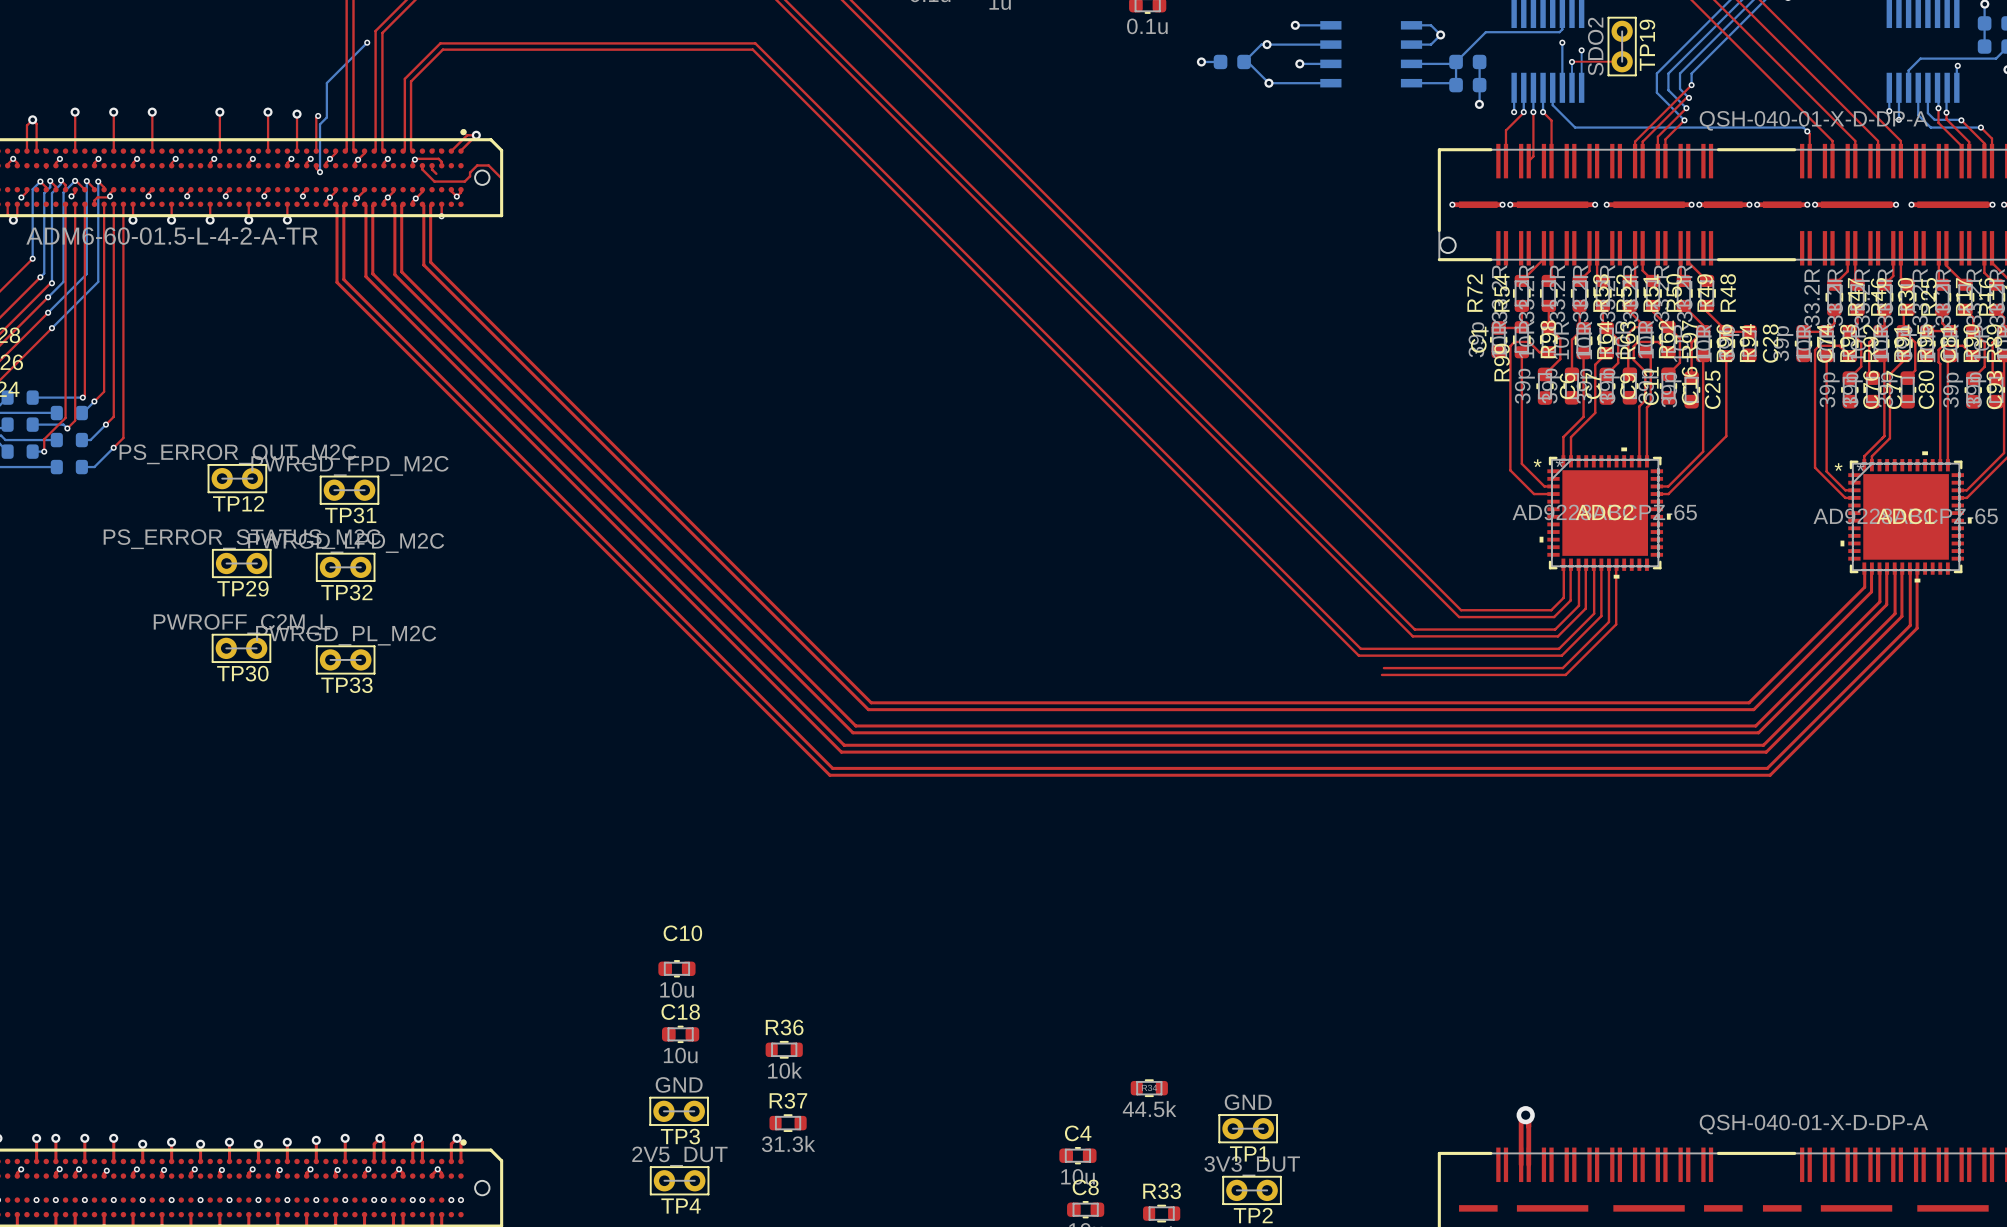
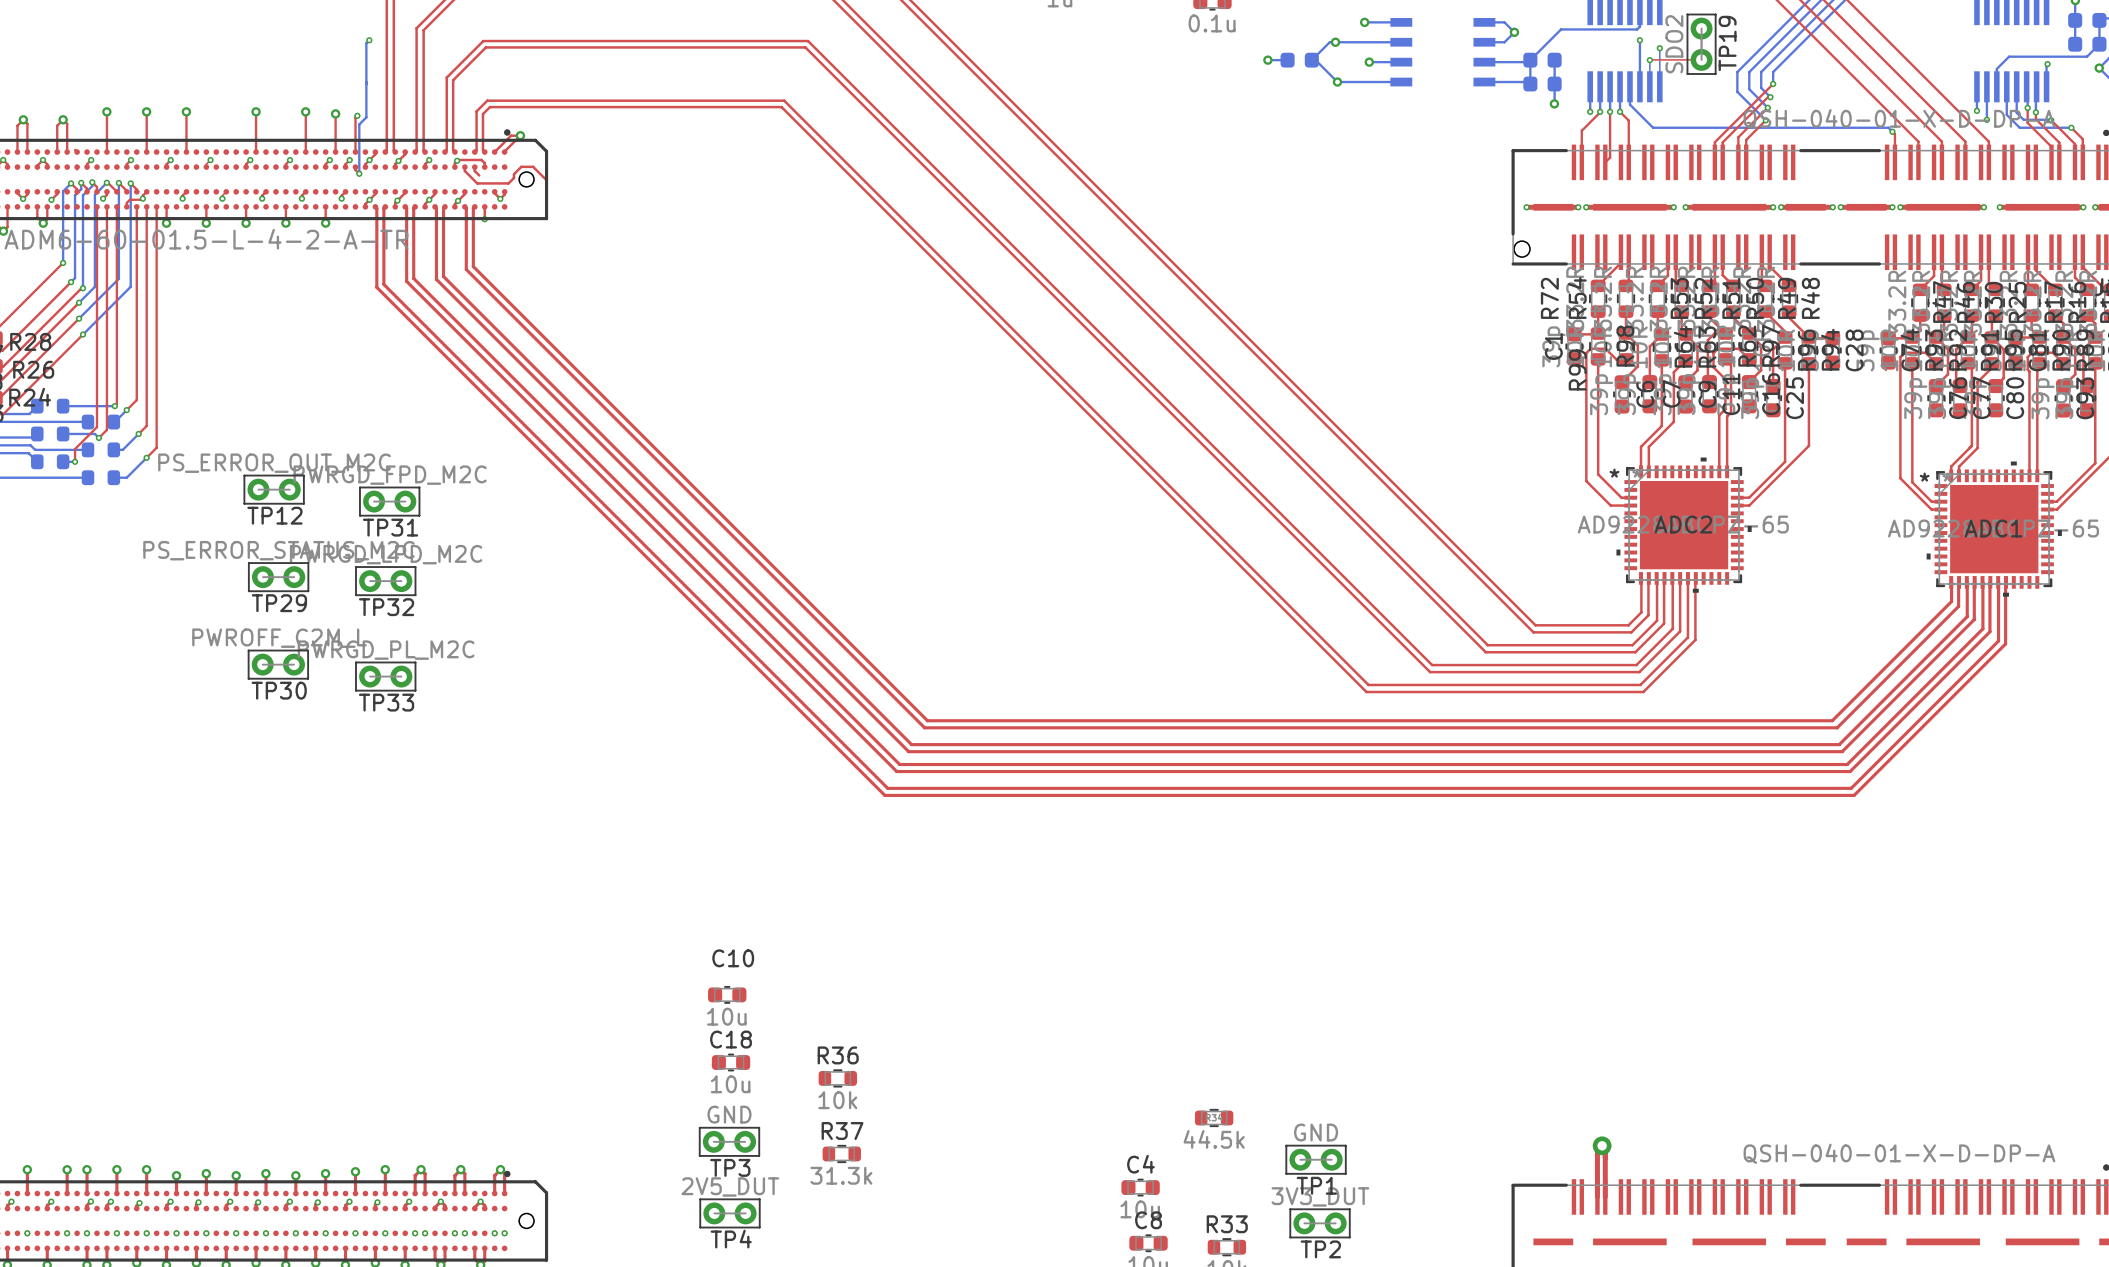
bottom track: (367, 42) (326, 83) -> (369, 40) (366, 43) (366, 81)
via position: (367, 42) -> (369, 40)
top track: none -> (476, 150) (476, 111) (487, 100) (784, 100) (1368, 684) (1456, 684)
top track: none -> (483, 150) (482, 114) (489, 107) (781, 107) (1366, 692) (1453, 692)

